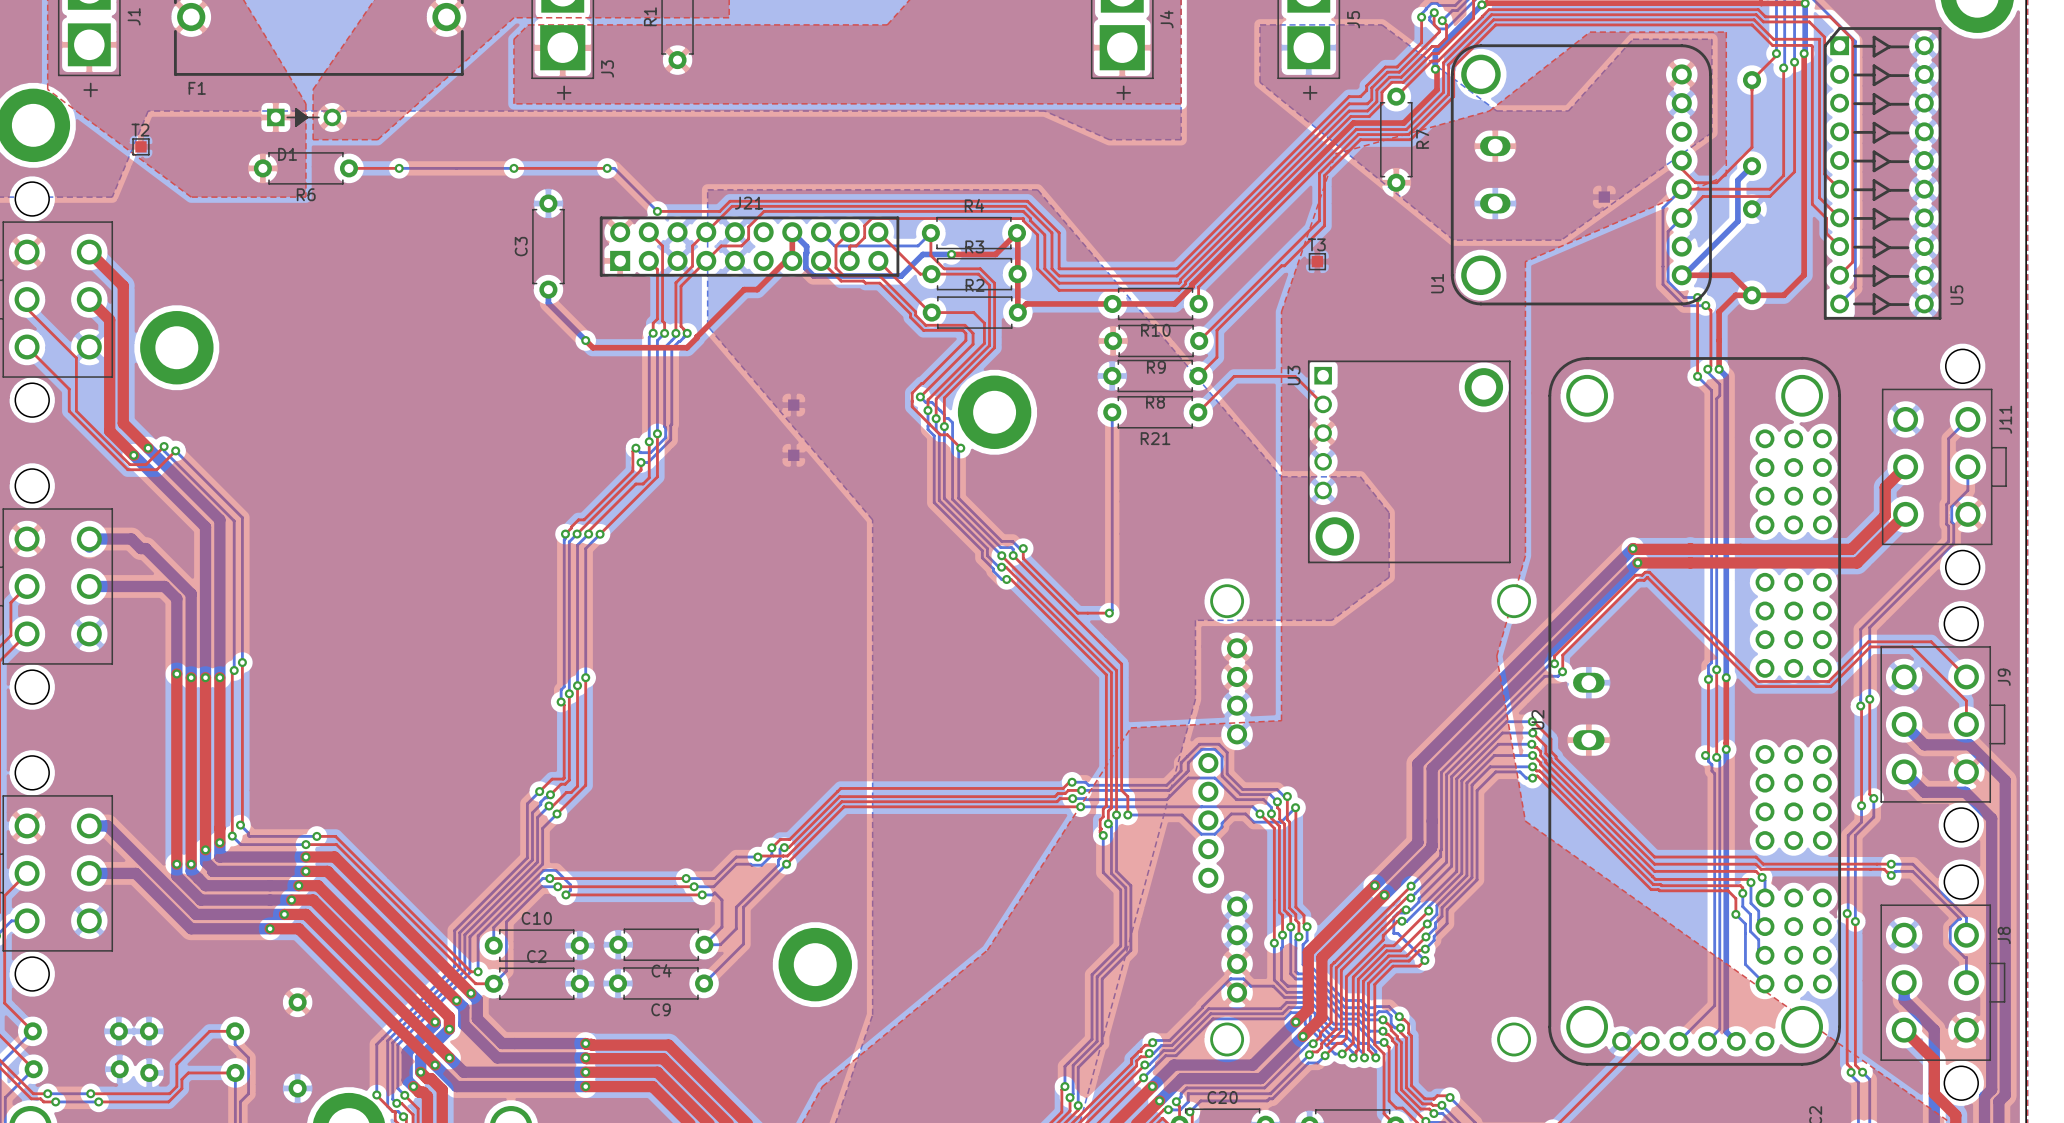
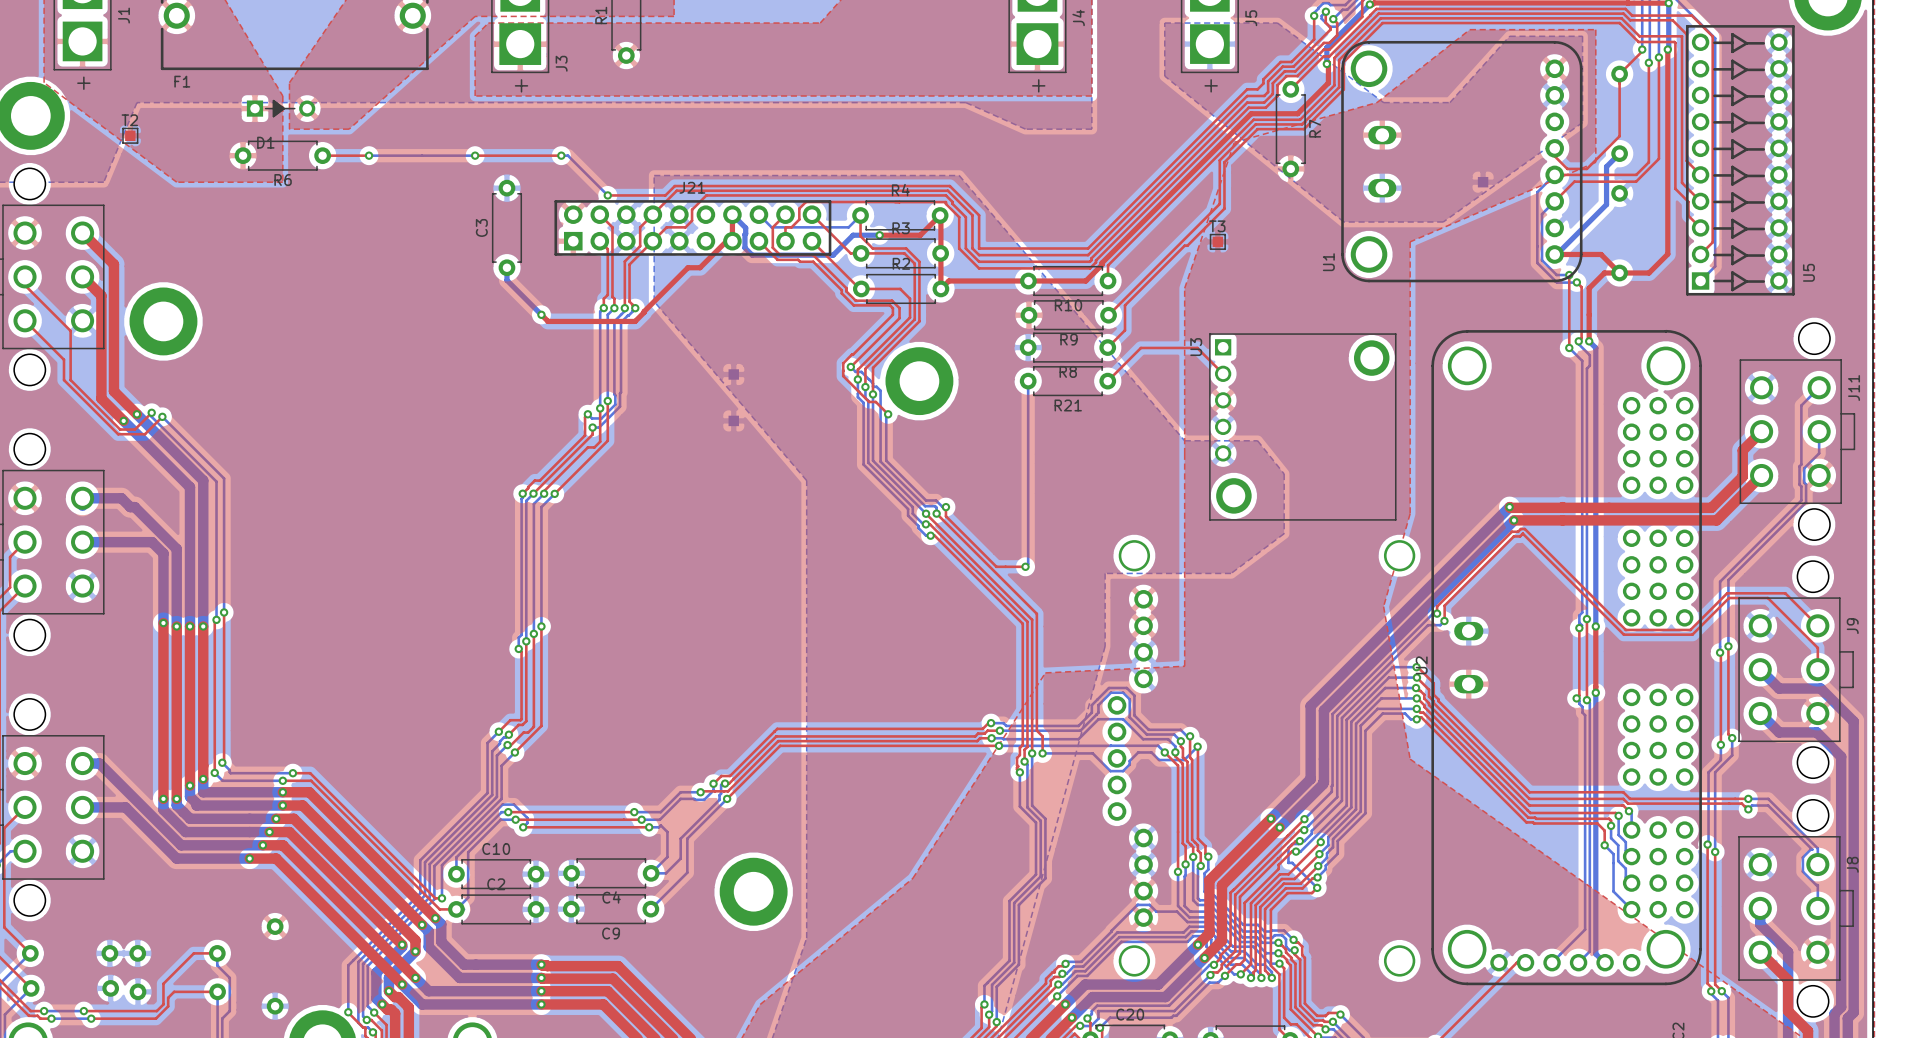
U5 footprint: [1823, 27, 1942, 320] -> [1686, 25, 1795, 296]

